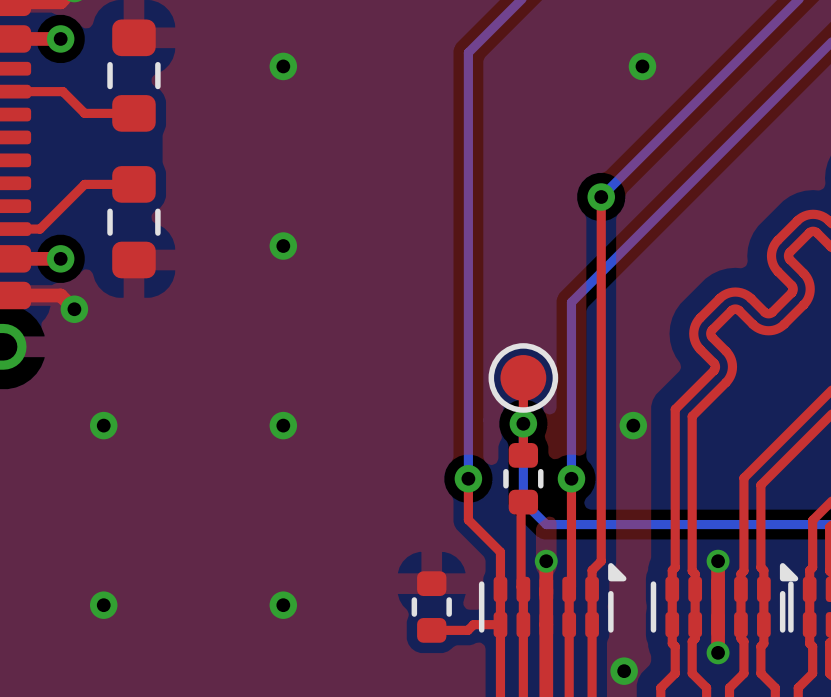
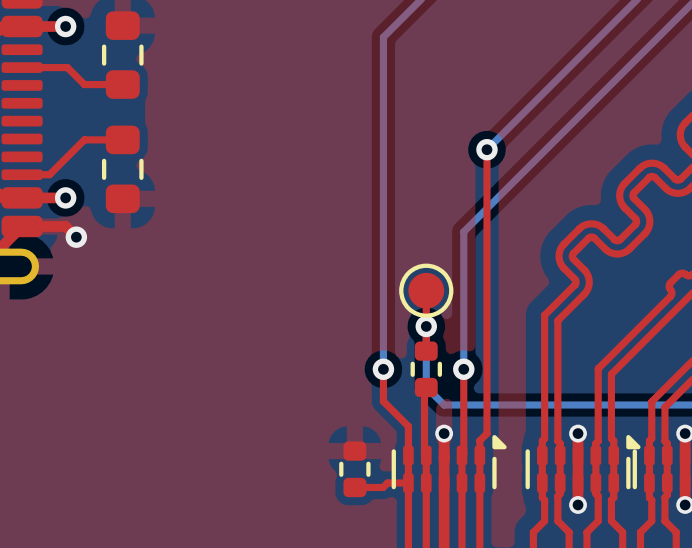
via: (283, 66) -> none
via: (642, 66) -> none
via: (283, 246) -> none
via: (103, 425) -> none
via: (283, 425) -> none
via: (633, 425) -> none
via: (103, 605) -> none
via: (283, 605) -> none
via: (624, 671) -> none

